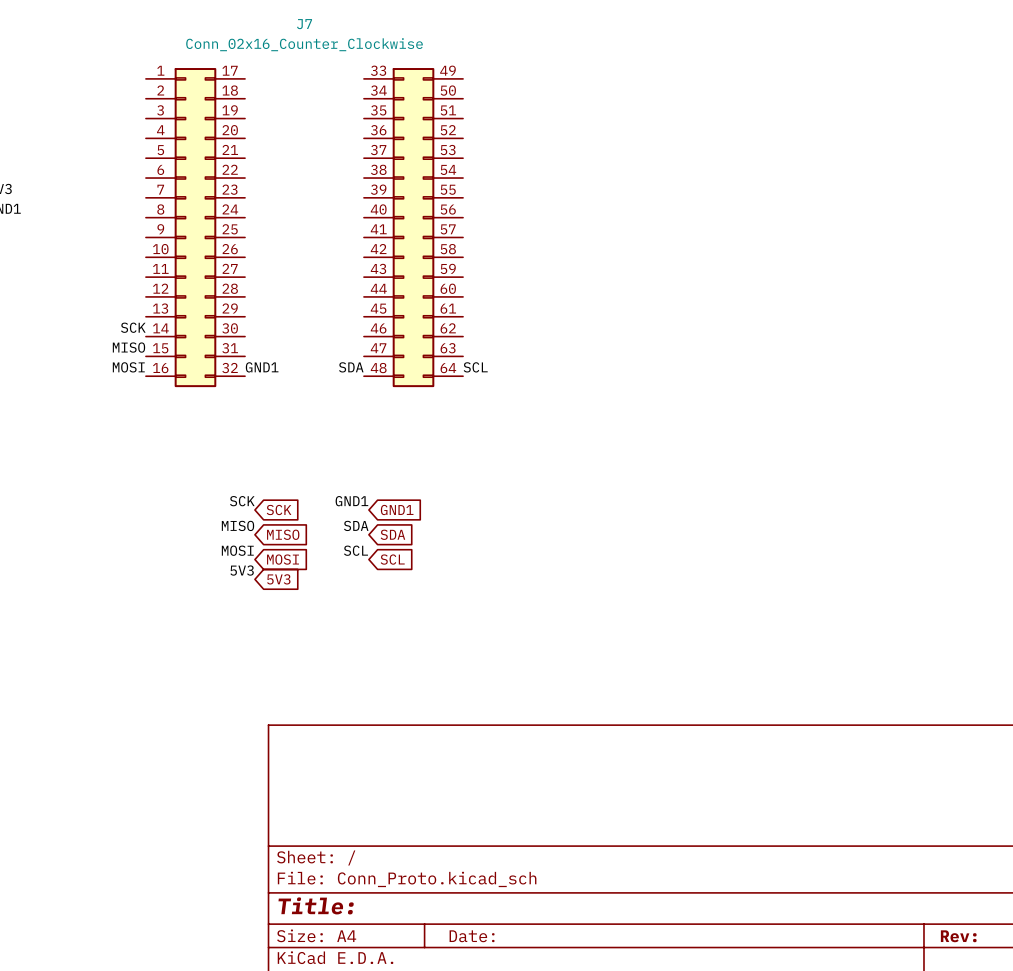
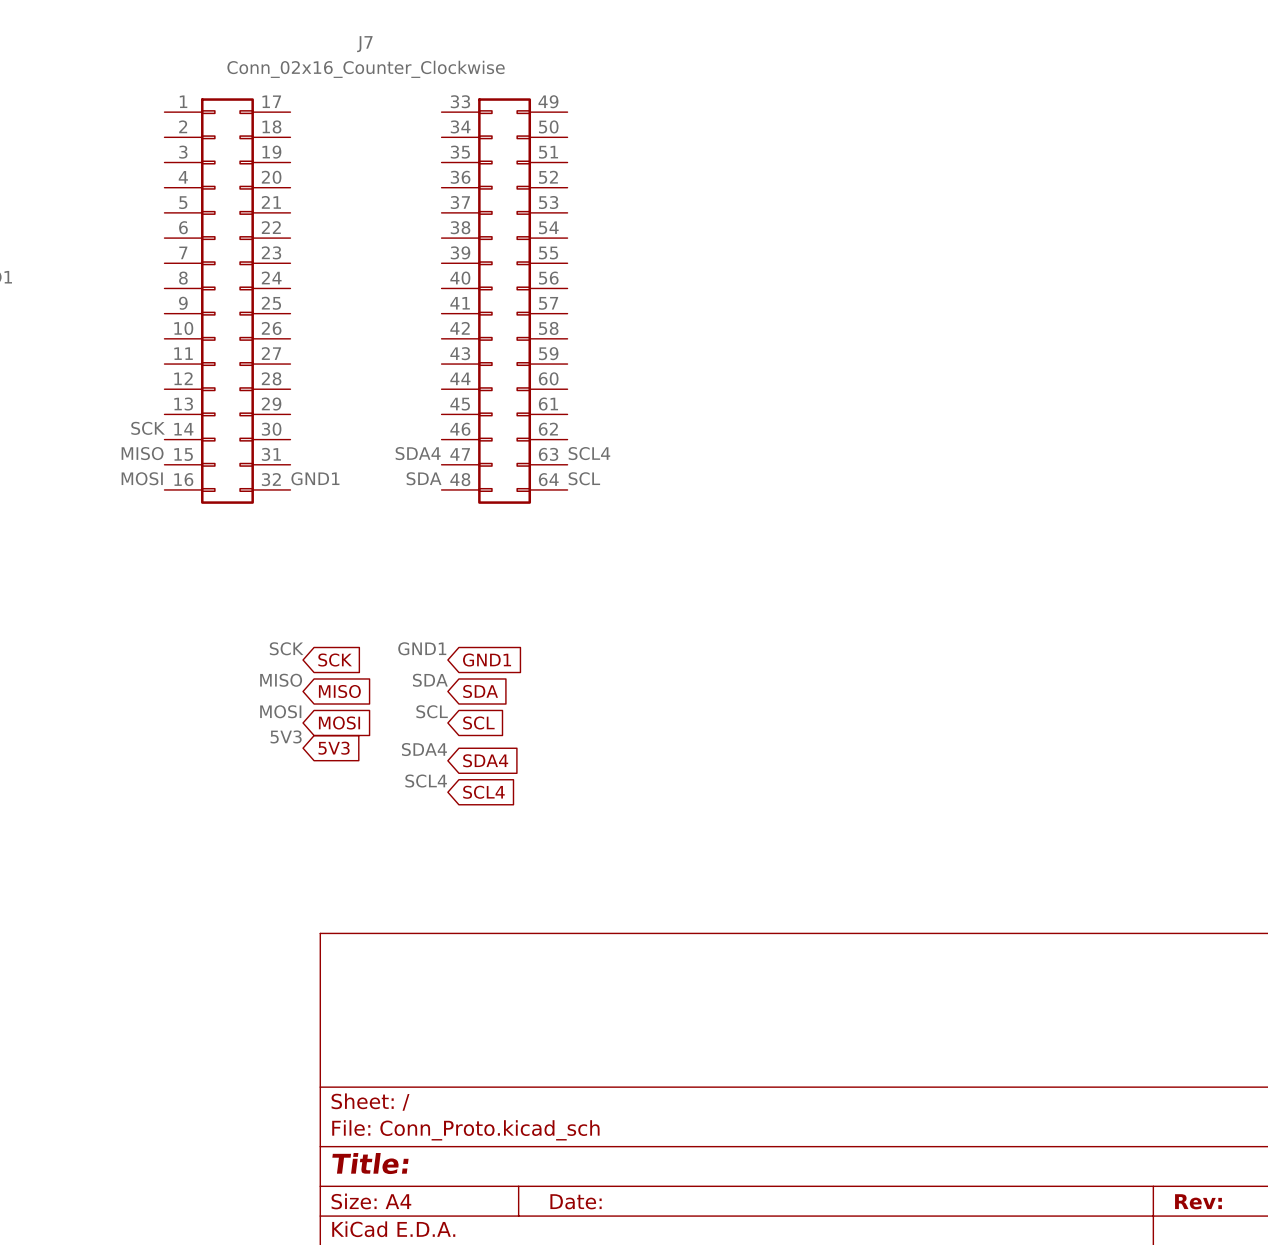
label: none -> SDA4 (418, 453)
label: none -> SCL4 (589, 453)
label: none -> SDA4 (424, 749)
global label: none -> SDA4 (485, 760)
label: none -> SCL4 (426, 781)
global label: none -> SCL4 (483, 792)

